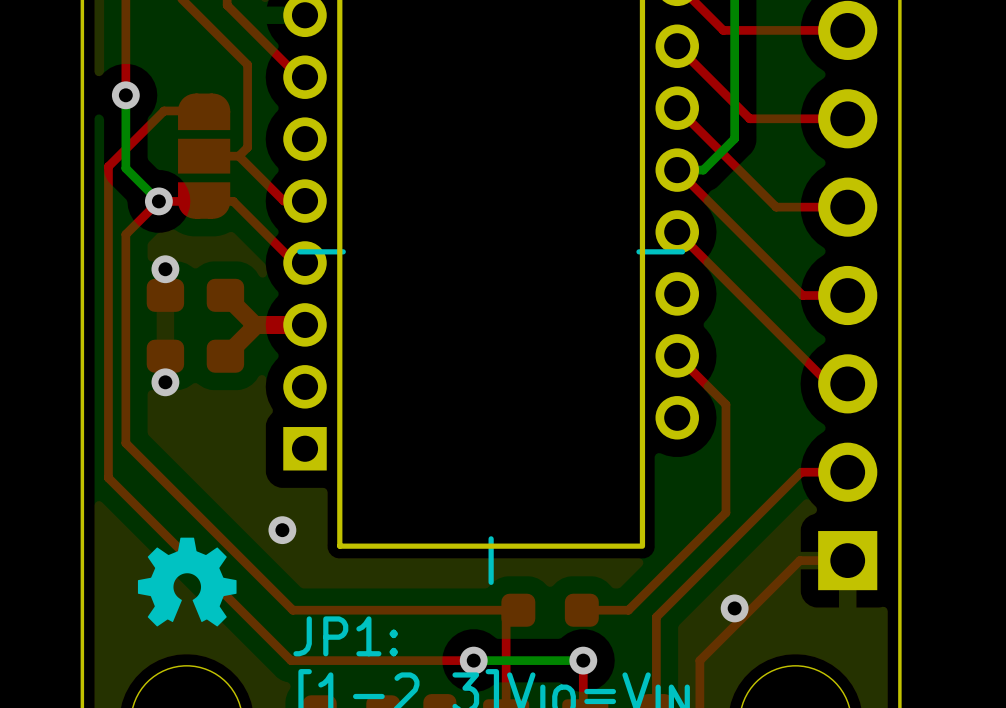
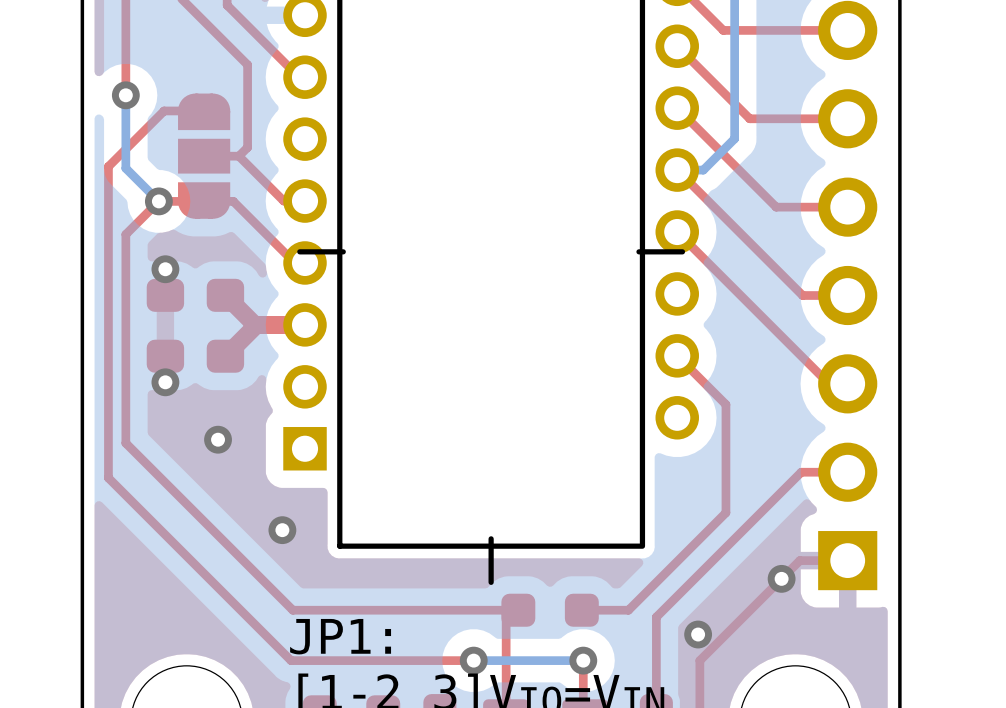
via: none -> (218, 439)
drawing: [137, 537, 237, 627] -> none
via: none -> (781, 578)
via: (734, 608) -> none
via: none -> (698, 634)

